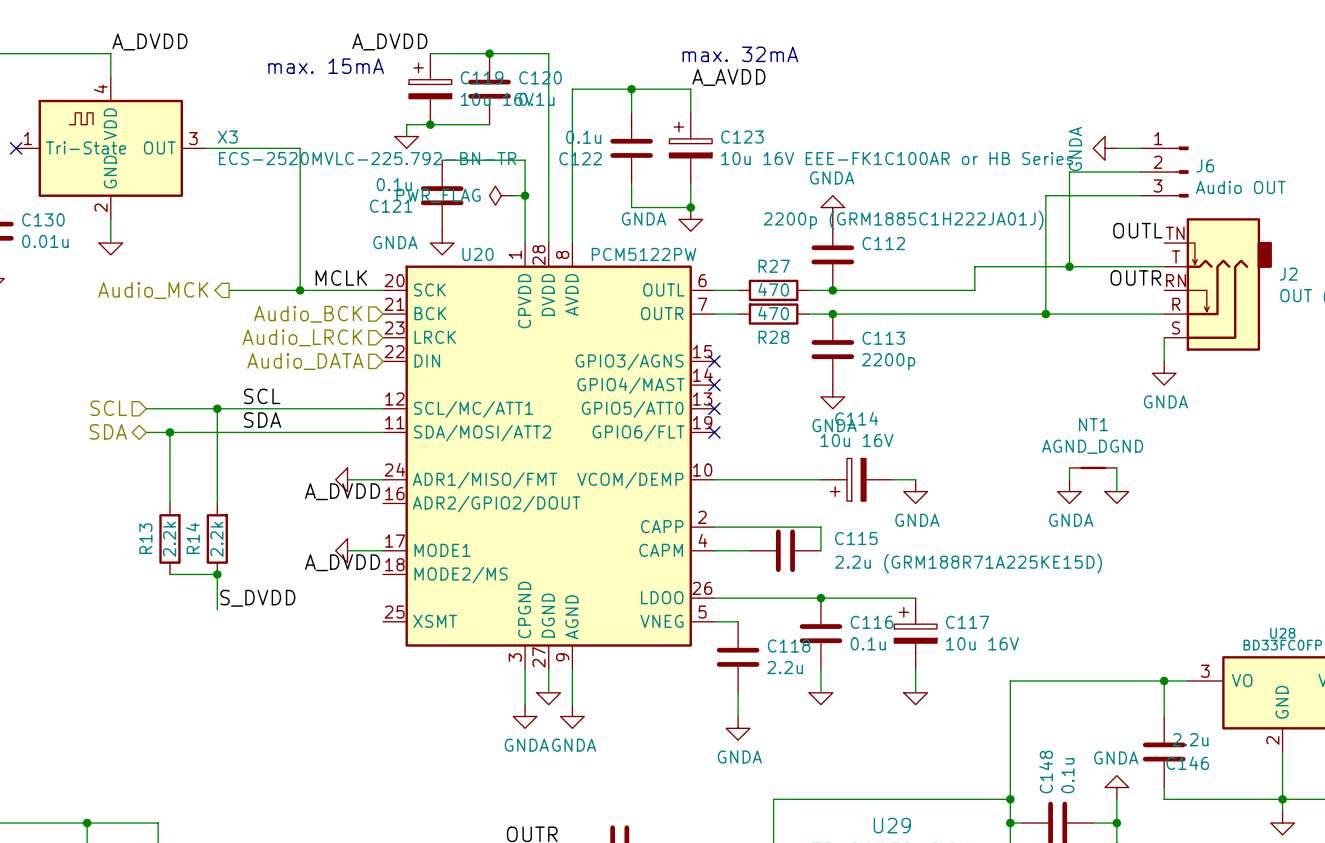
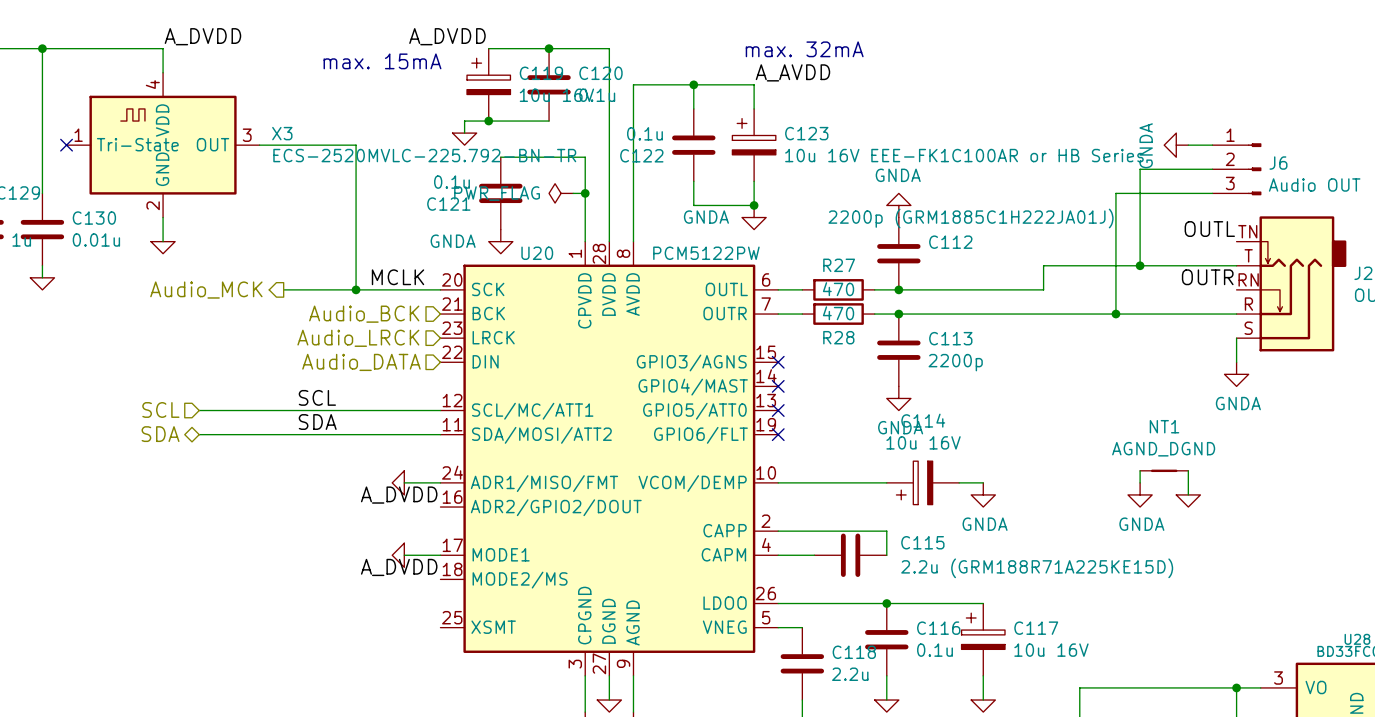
wire: (217, 408) (217, 503) -> none
junction: (217, 408) -> none
wire: (169, 432) (169, 503) -> none
junction: (169, 432) -> none
R13: 2.2k (169, 538) -> none
R14: 2.2k (217, 538) -> none
wire: (169, 574) (217, 574) (217, 609) -> none
junction: (217, 574) -> none
label: S_DVDD (257, 598) -> none

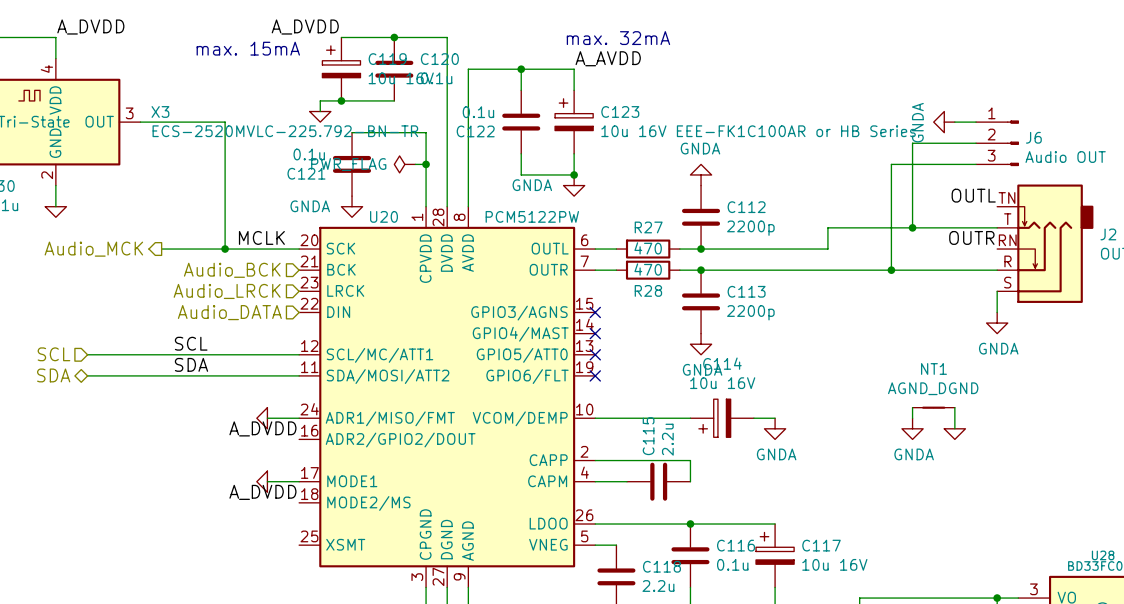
C112 value: 2200p (GRM1885C1H222JA01J) (971, 218) -> 2200p (750, 228)
C115 name rotation: 0° (922, 542) -> 90° counterclockwise (648, 436)
C115 name position: C115 (922, 542) -> C115 (648, 436)
C115 value: 2.2u (GRM188R71A225KE15D) (1037, 568) -> 2.2u (667, 439)

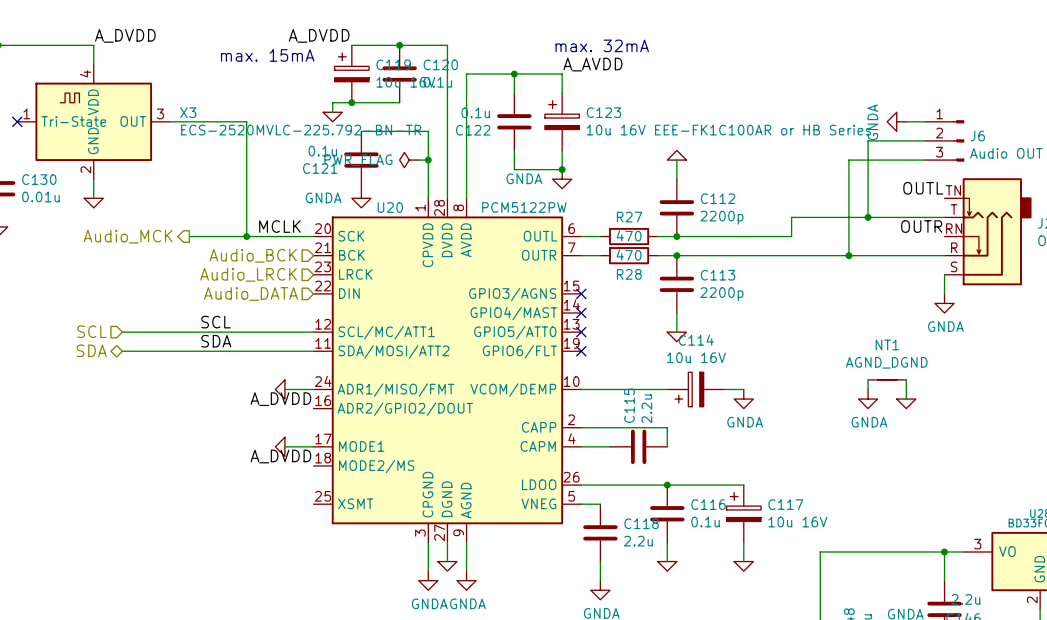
power symbol: none -> (676, 155)
power symbol: GNDA (701, 174) -> none
power symbol: GNDA (701, 344) -> none
power symbol: none -> (676, 336)

